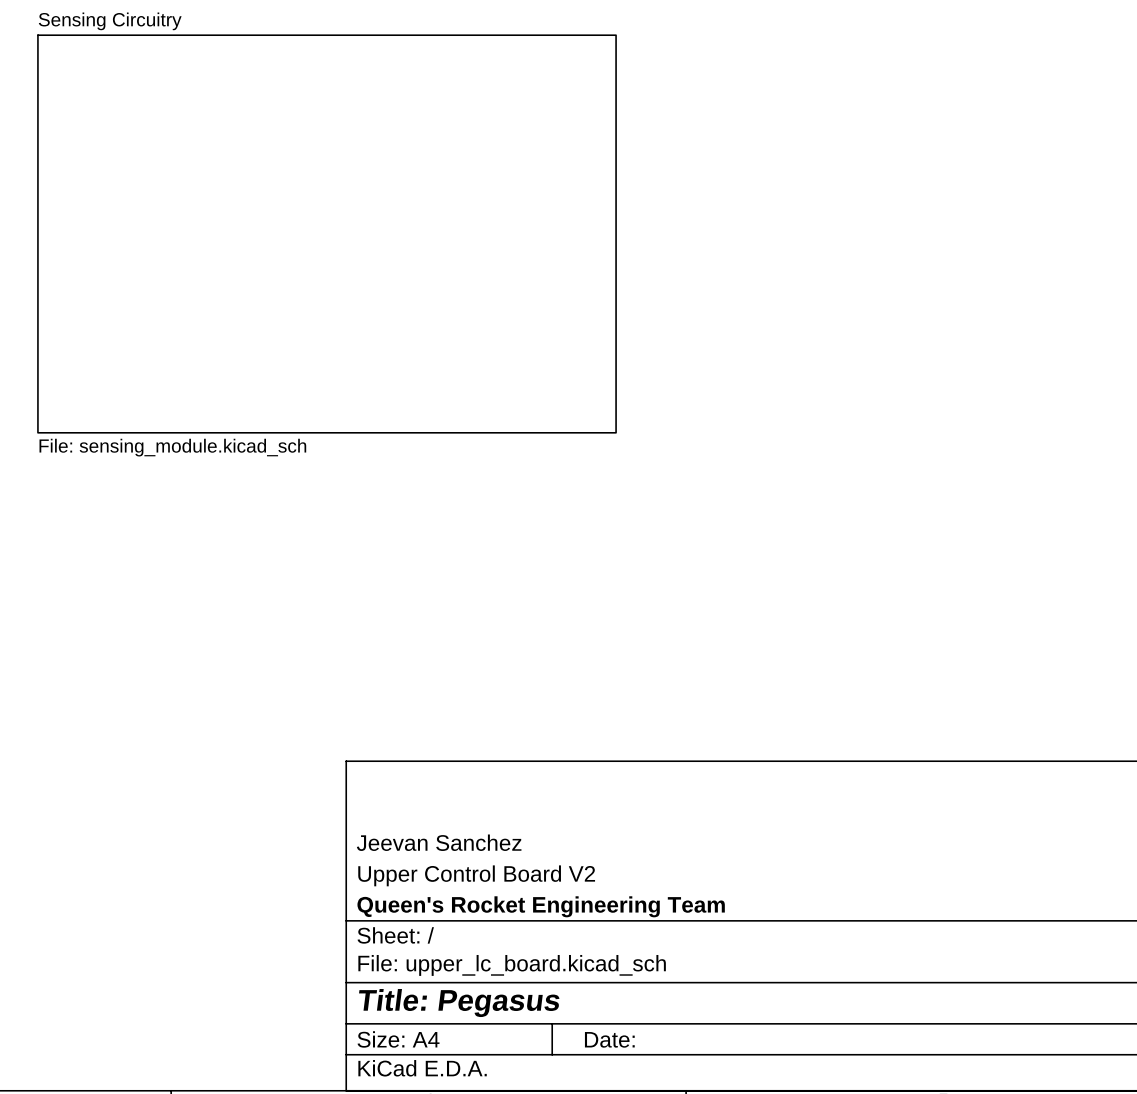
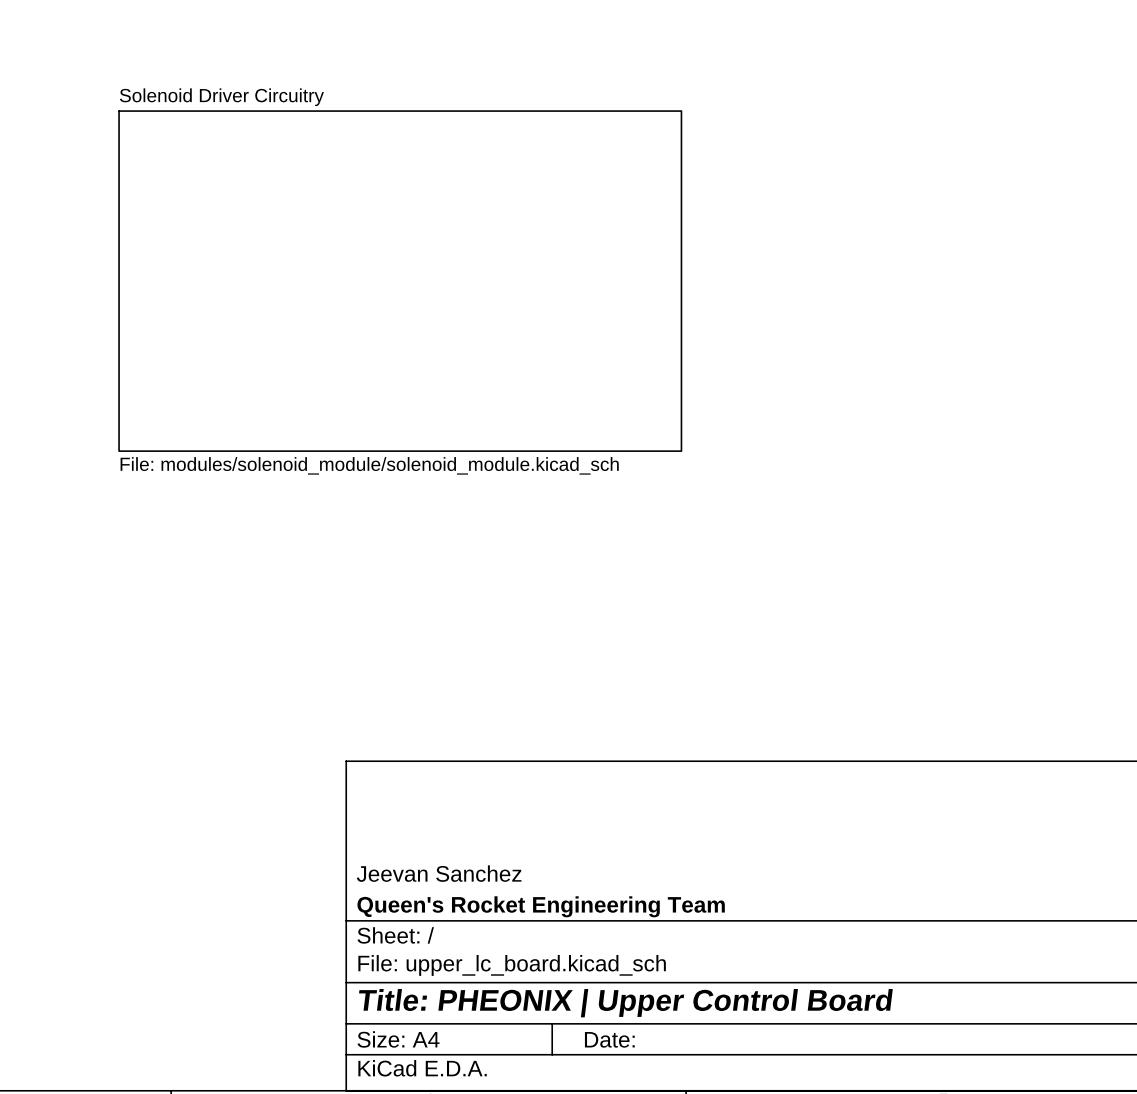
sheet Sensing Circuitry: File: sensing_module.kicad_sch (327, 234) -> none
sheet Solenoid Driver Circuitry: none -> File: modules/solenoid_module/solenoid_module.kicad_sch (400, 281)
title block: Jeevan Sanchez (439, 842) -> none
title block: Upper Control Board V2 (476, 875) -> Jeevan Sanchez (439, 873)
title block: Title: Pegasus (459, 1003) -> Title: PHEONIX | Upper Control Board (625, 1003)

